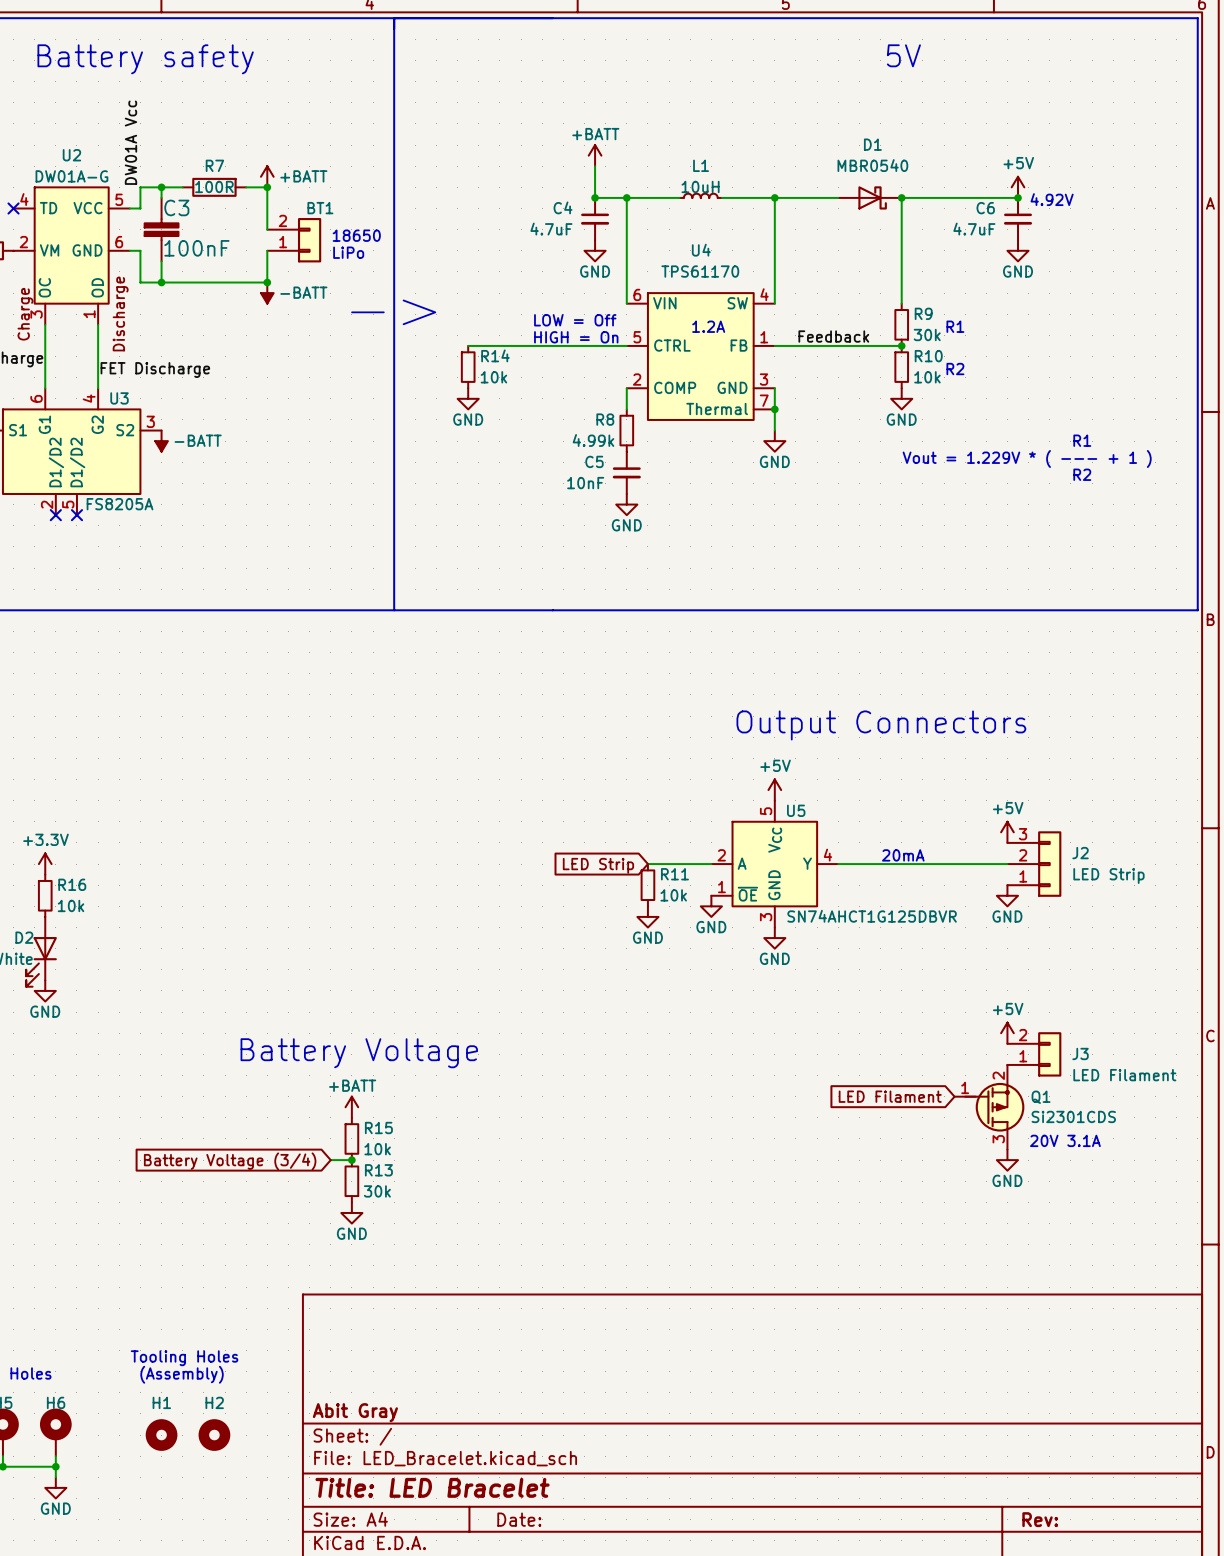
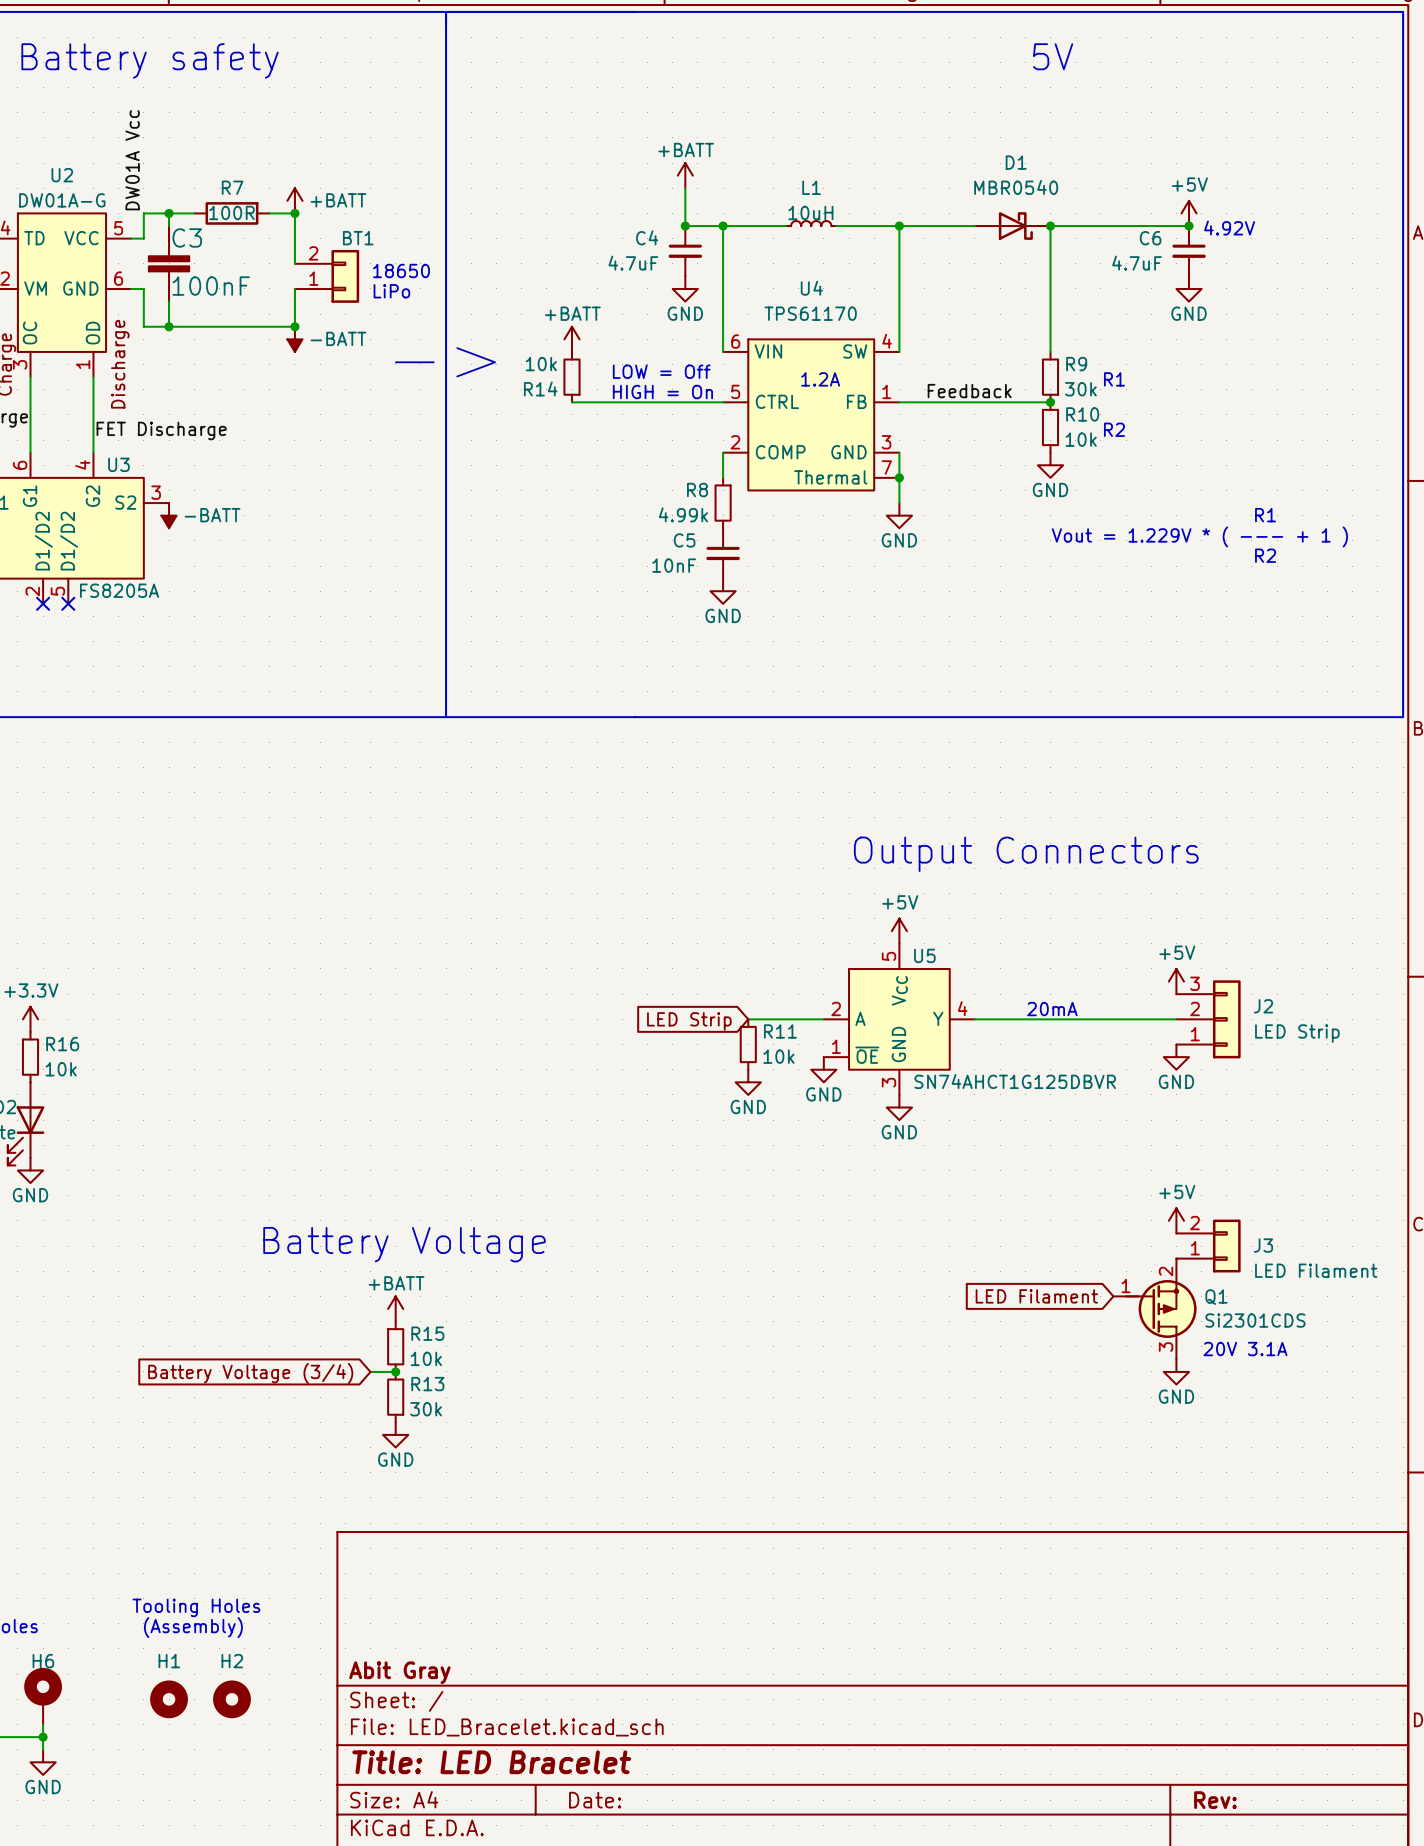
power symbol: none -> +BATT (571, 339)
wire: (468, 345) (499, 345) -> none
R14 name position: R14 (495, 355) -> R14 (540, 388)
R14 position: (468, 367) -> (571, 377)
R14 value position: 10k (493, 377) -> 10k (541, 364)
power symbol: GND (468, 398) -> none

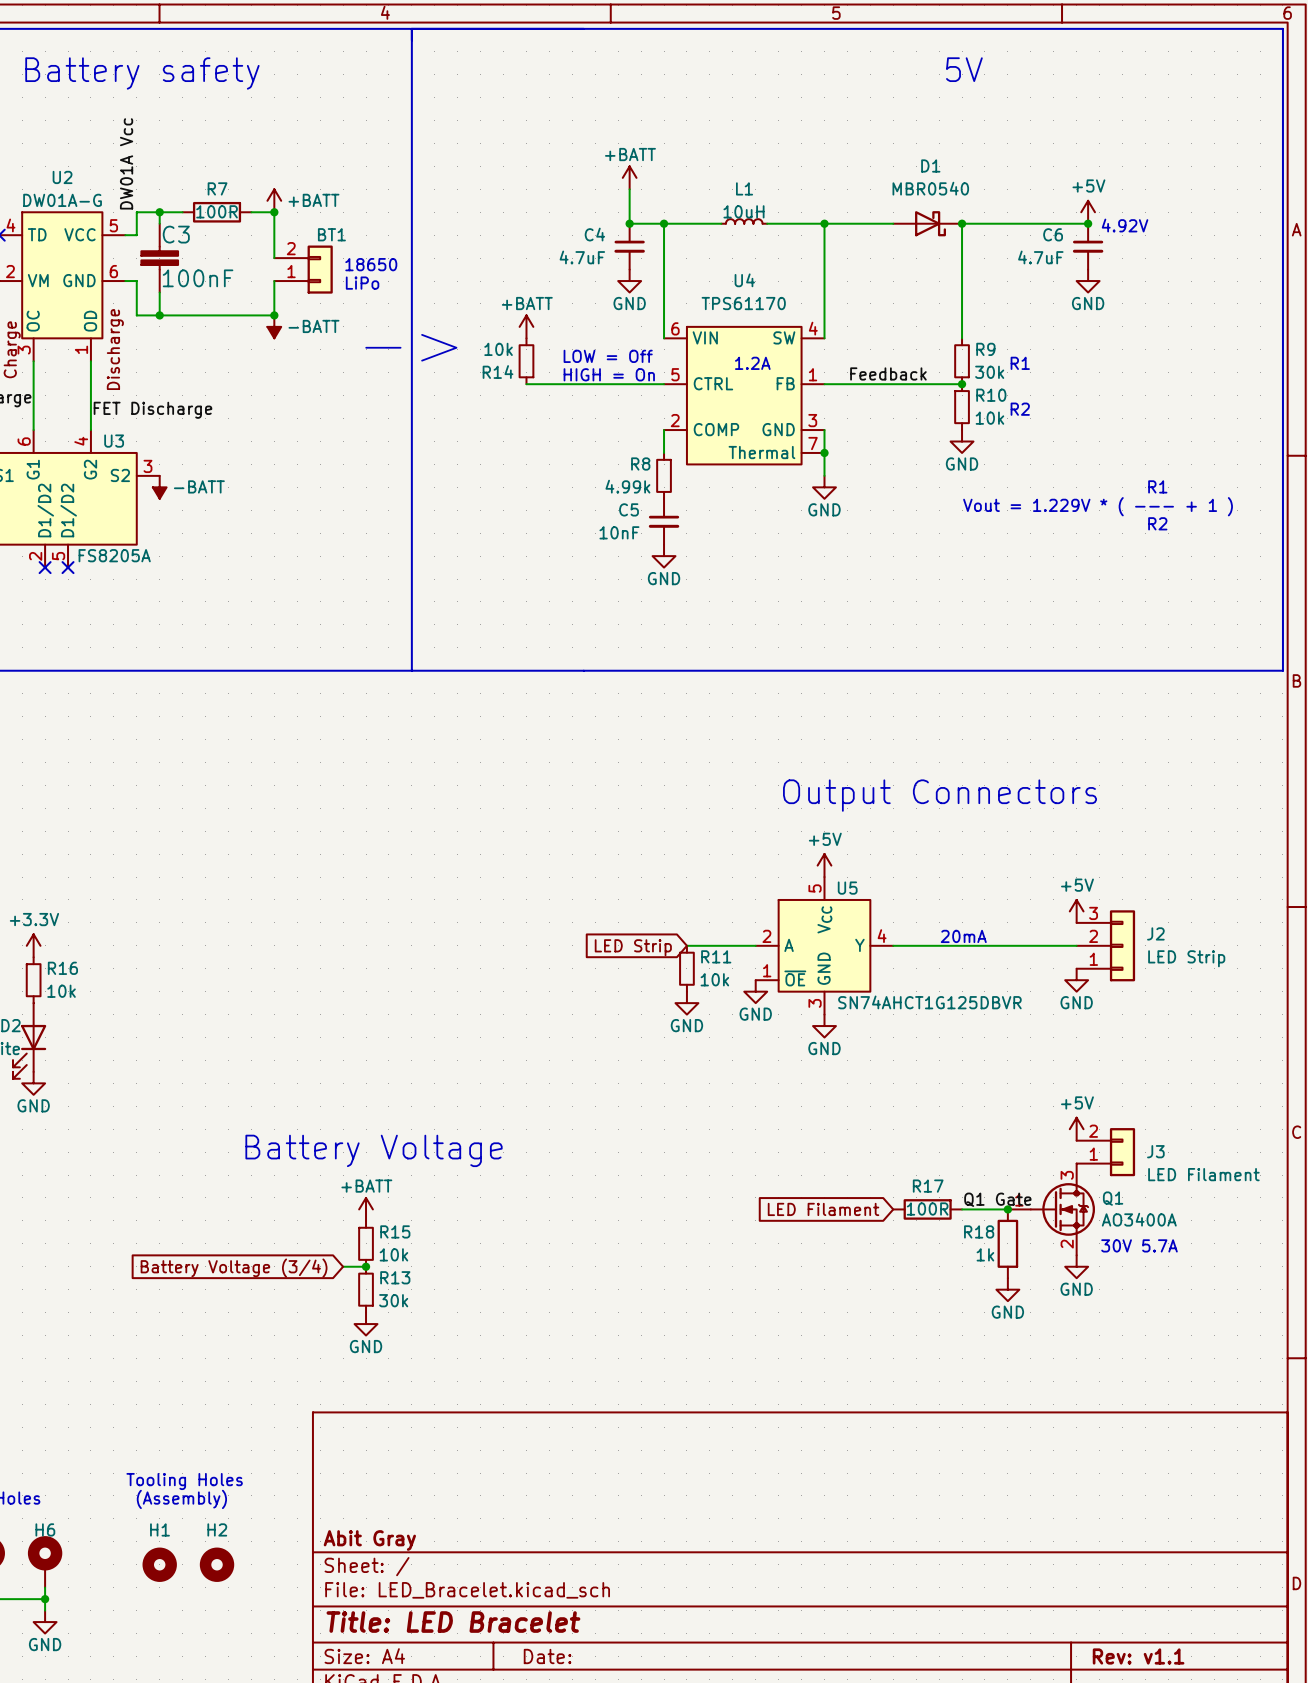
Q1 symbol: [1113, 1258, 1197, 1360] -> [1007, 1163, 1095, 1256]
global label position: LED Filament (1036, 1296) -> LED Filament (823, 1209)
label: none -> Q1 Gate (997, 1199)
R17: none -> 100R (927, 1209)
junction: none -> (1007, 1209)
Q1 value: Si2301CDS (1255, 1320) -> AO3400A (1139, 1219)
R18: none -> 1k (1007, 1243)
text: 20V 3.1A (1245, 1349) -> 30V 5.7A (1139, 1245)
power symbol: none -> GND (1007, 1289)
title block: Rev: (1215, 1800) -> Rev: v1.1 (1138, 1656)

